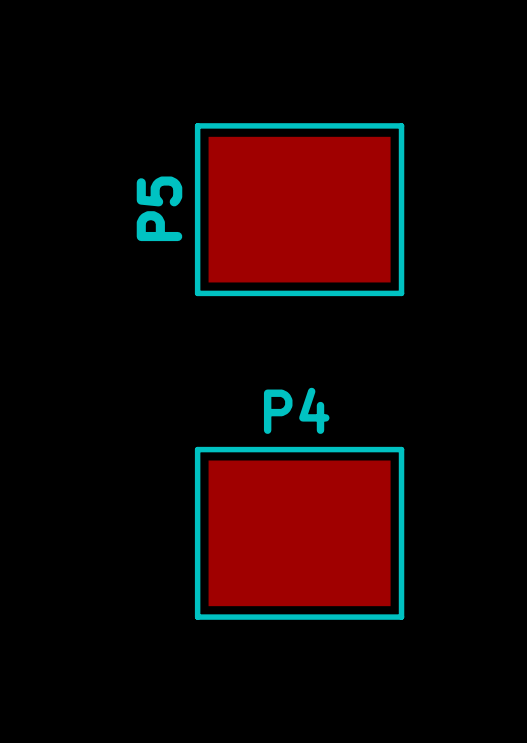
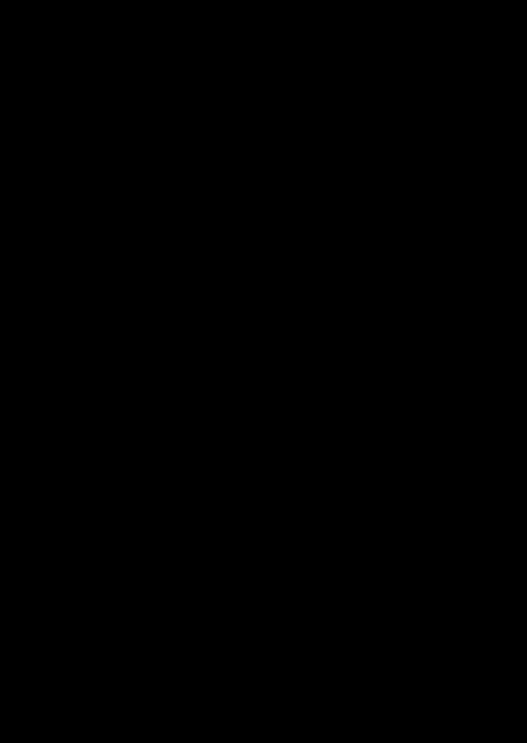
P5: (299, 209) -> none
P4: (299, 533) -> none

